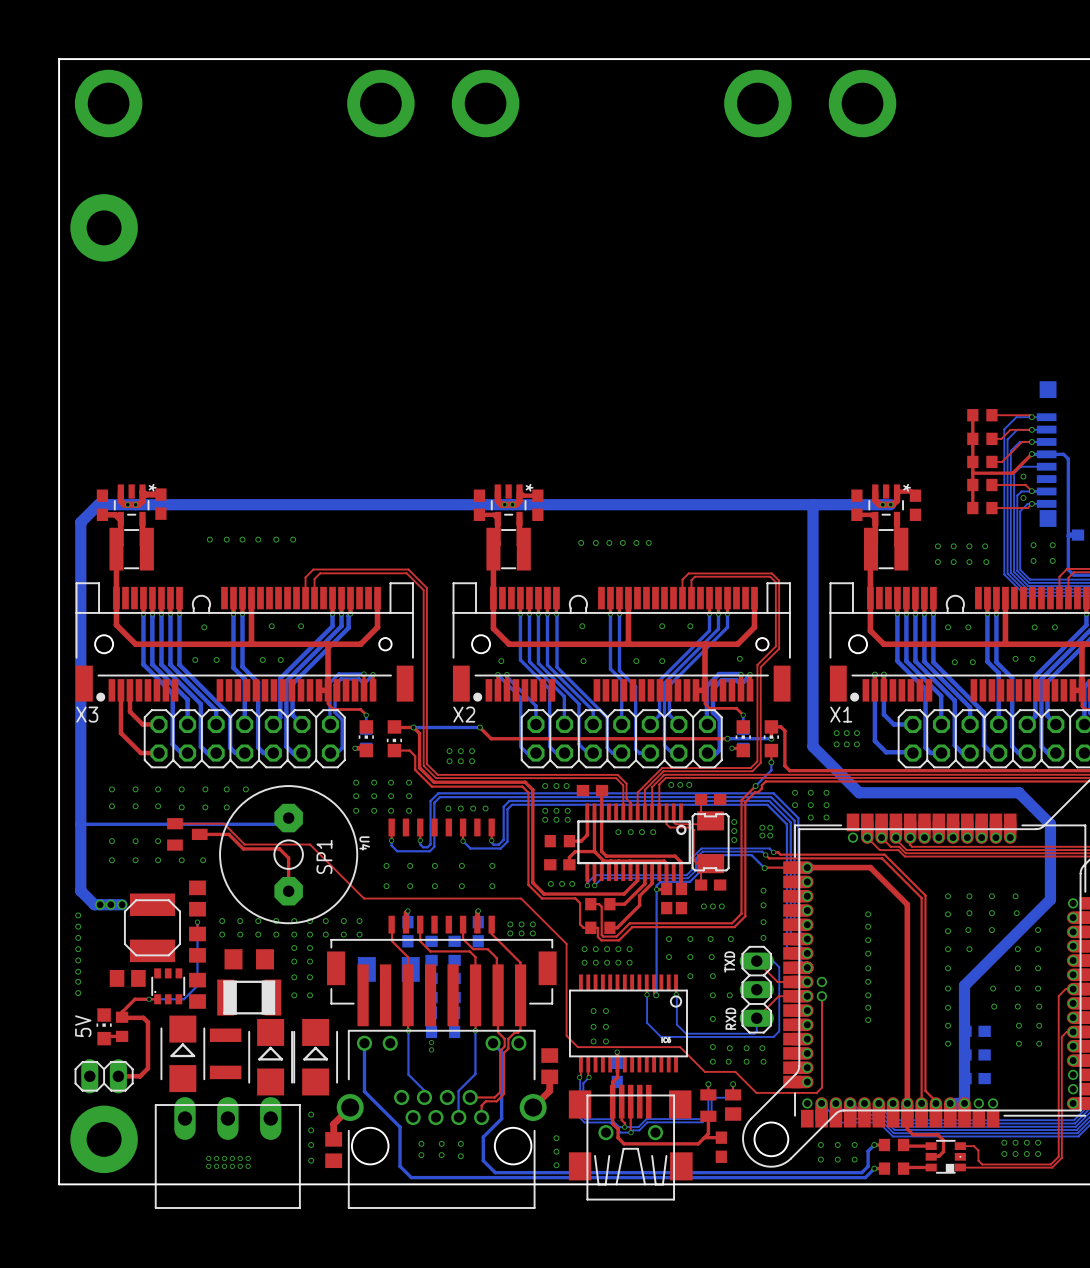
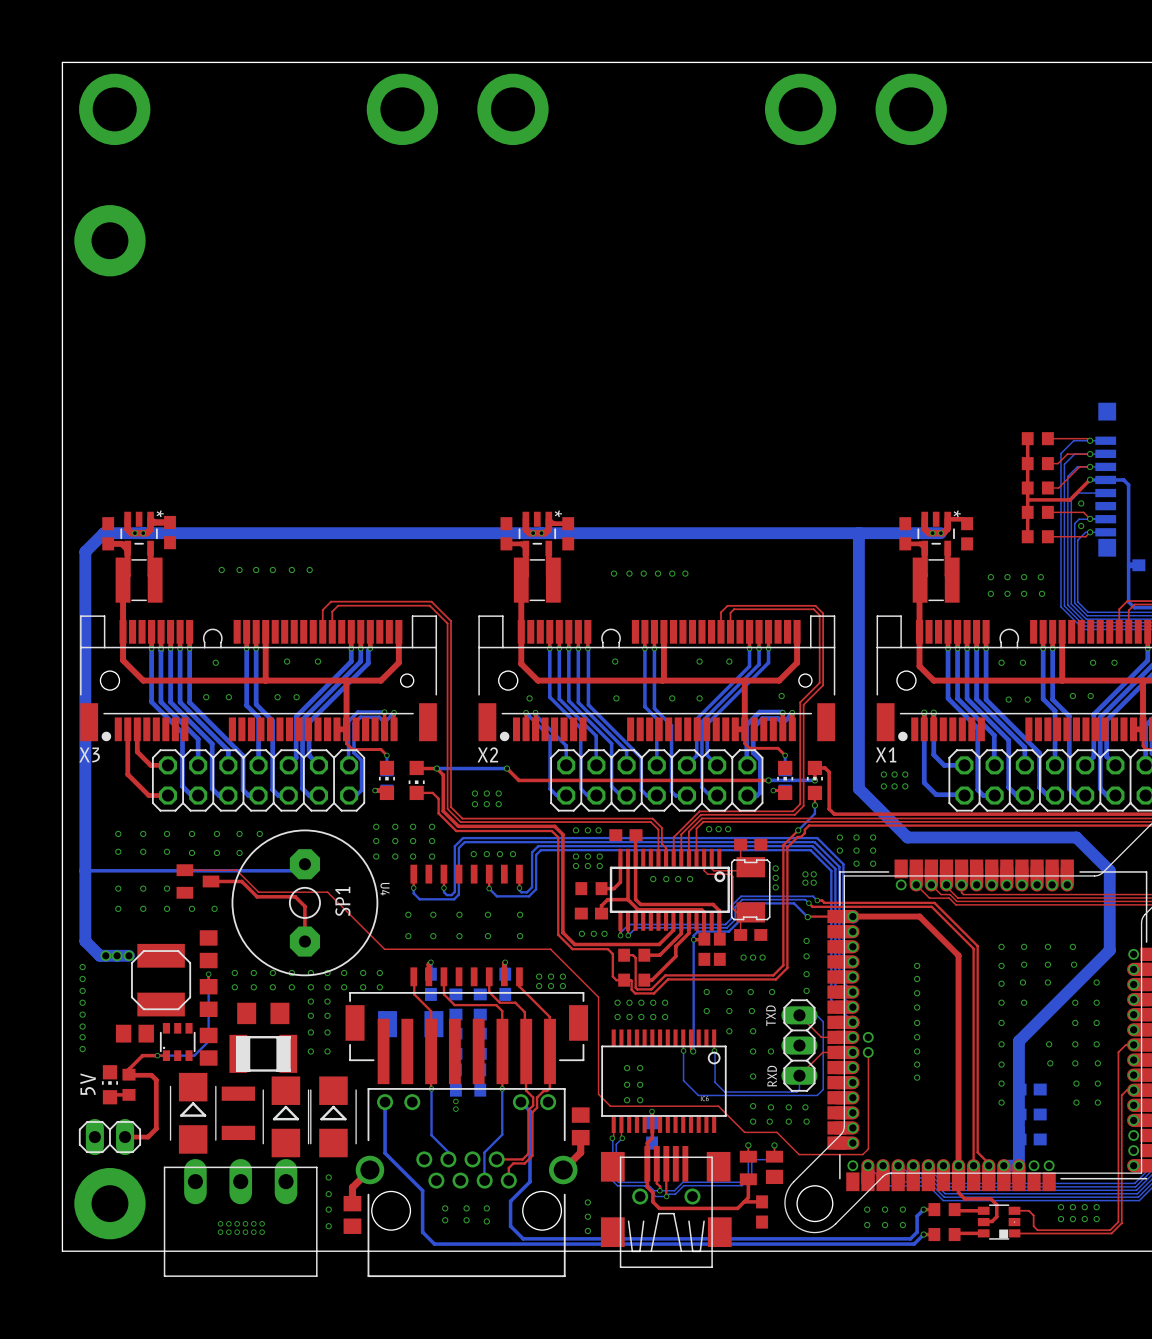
via: (1033, 545) -> none
via: (1052, 545) -> none
via: (1033, 560) -> none
via: (1052, 560) -> none

